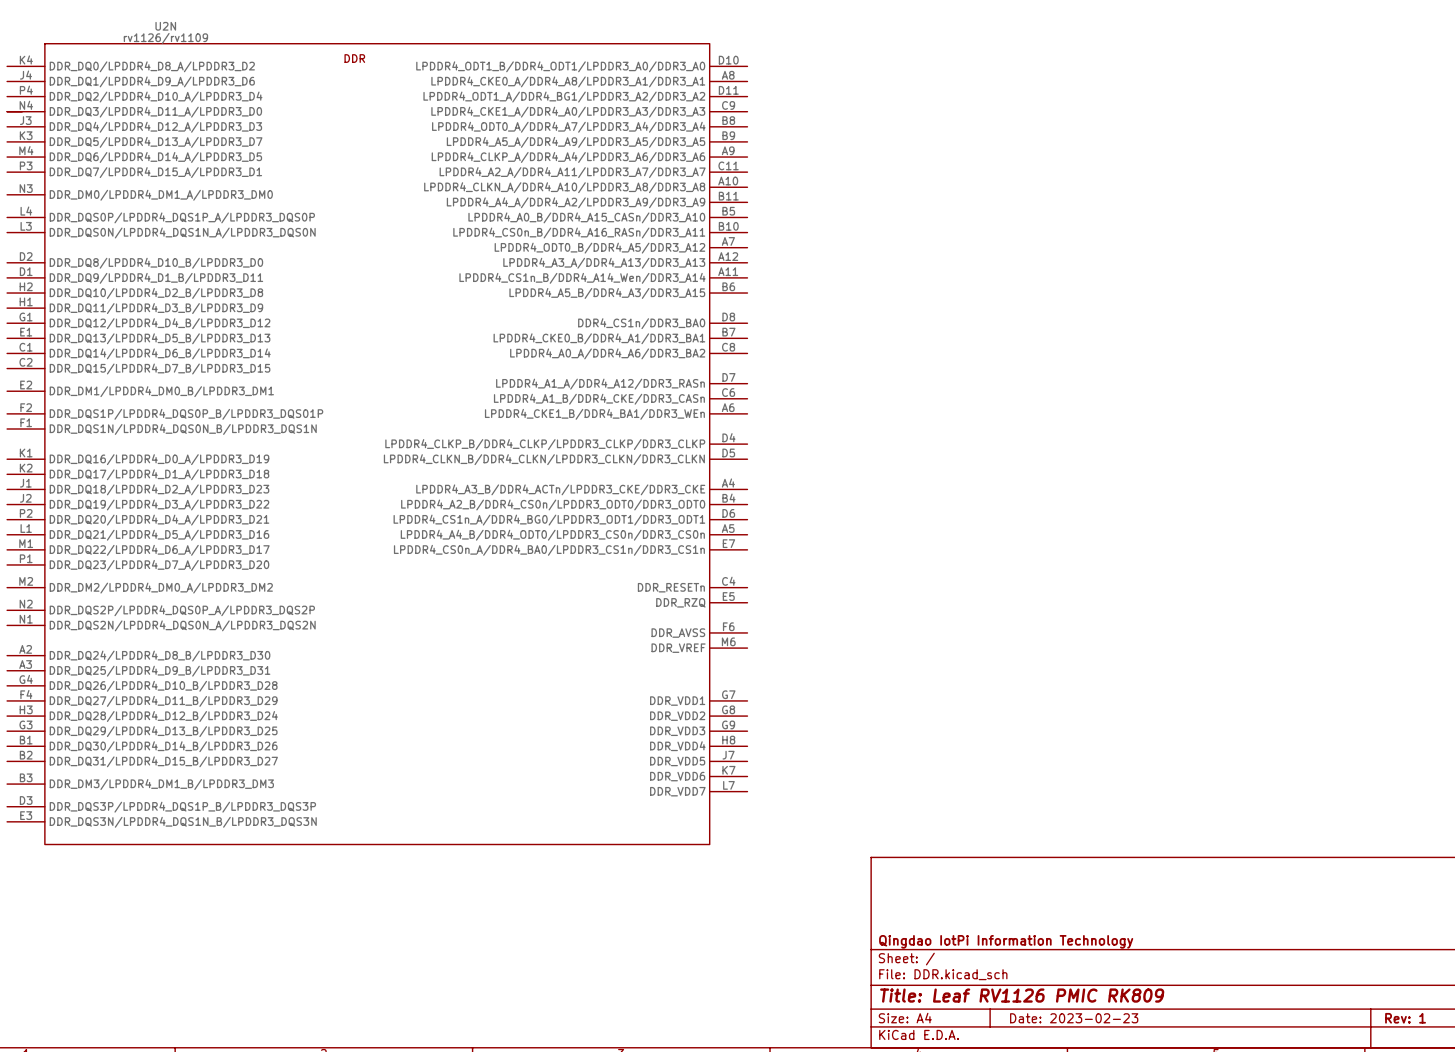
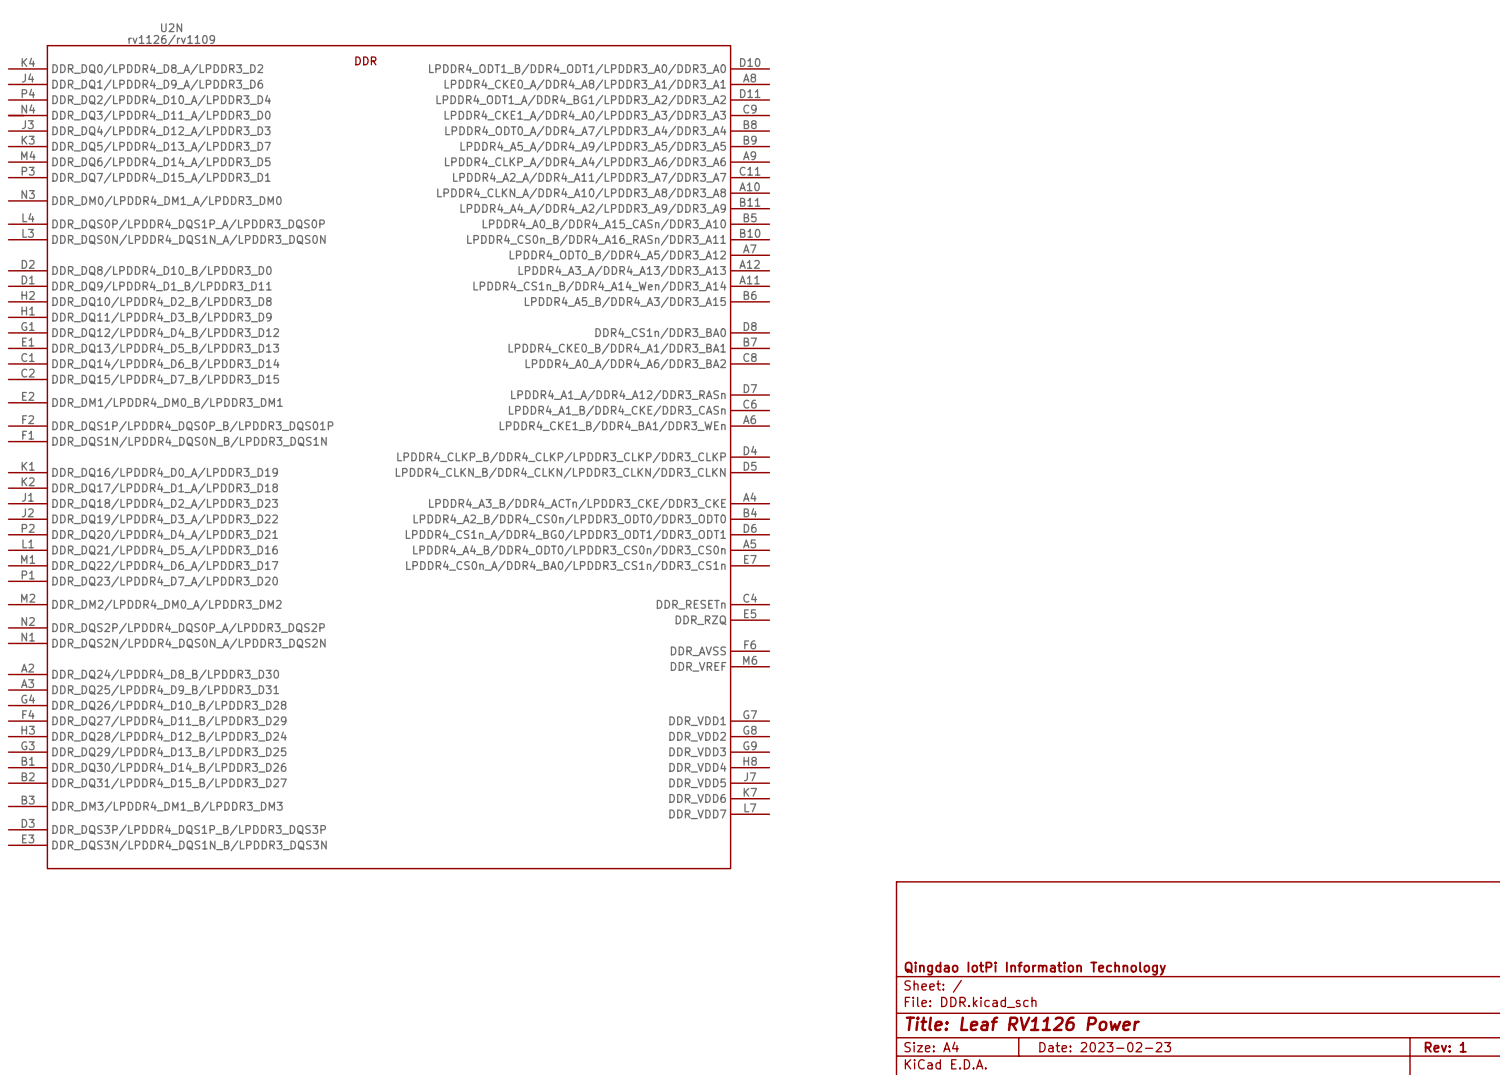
title block: Title: Leaf RV1126 PMIC RK809 (1022, 995) -> Title: Leaf RV1126 Power (1022, 1023)

